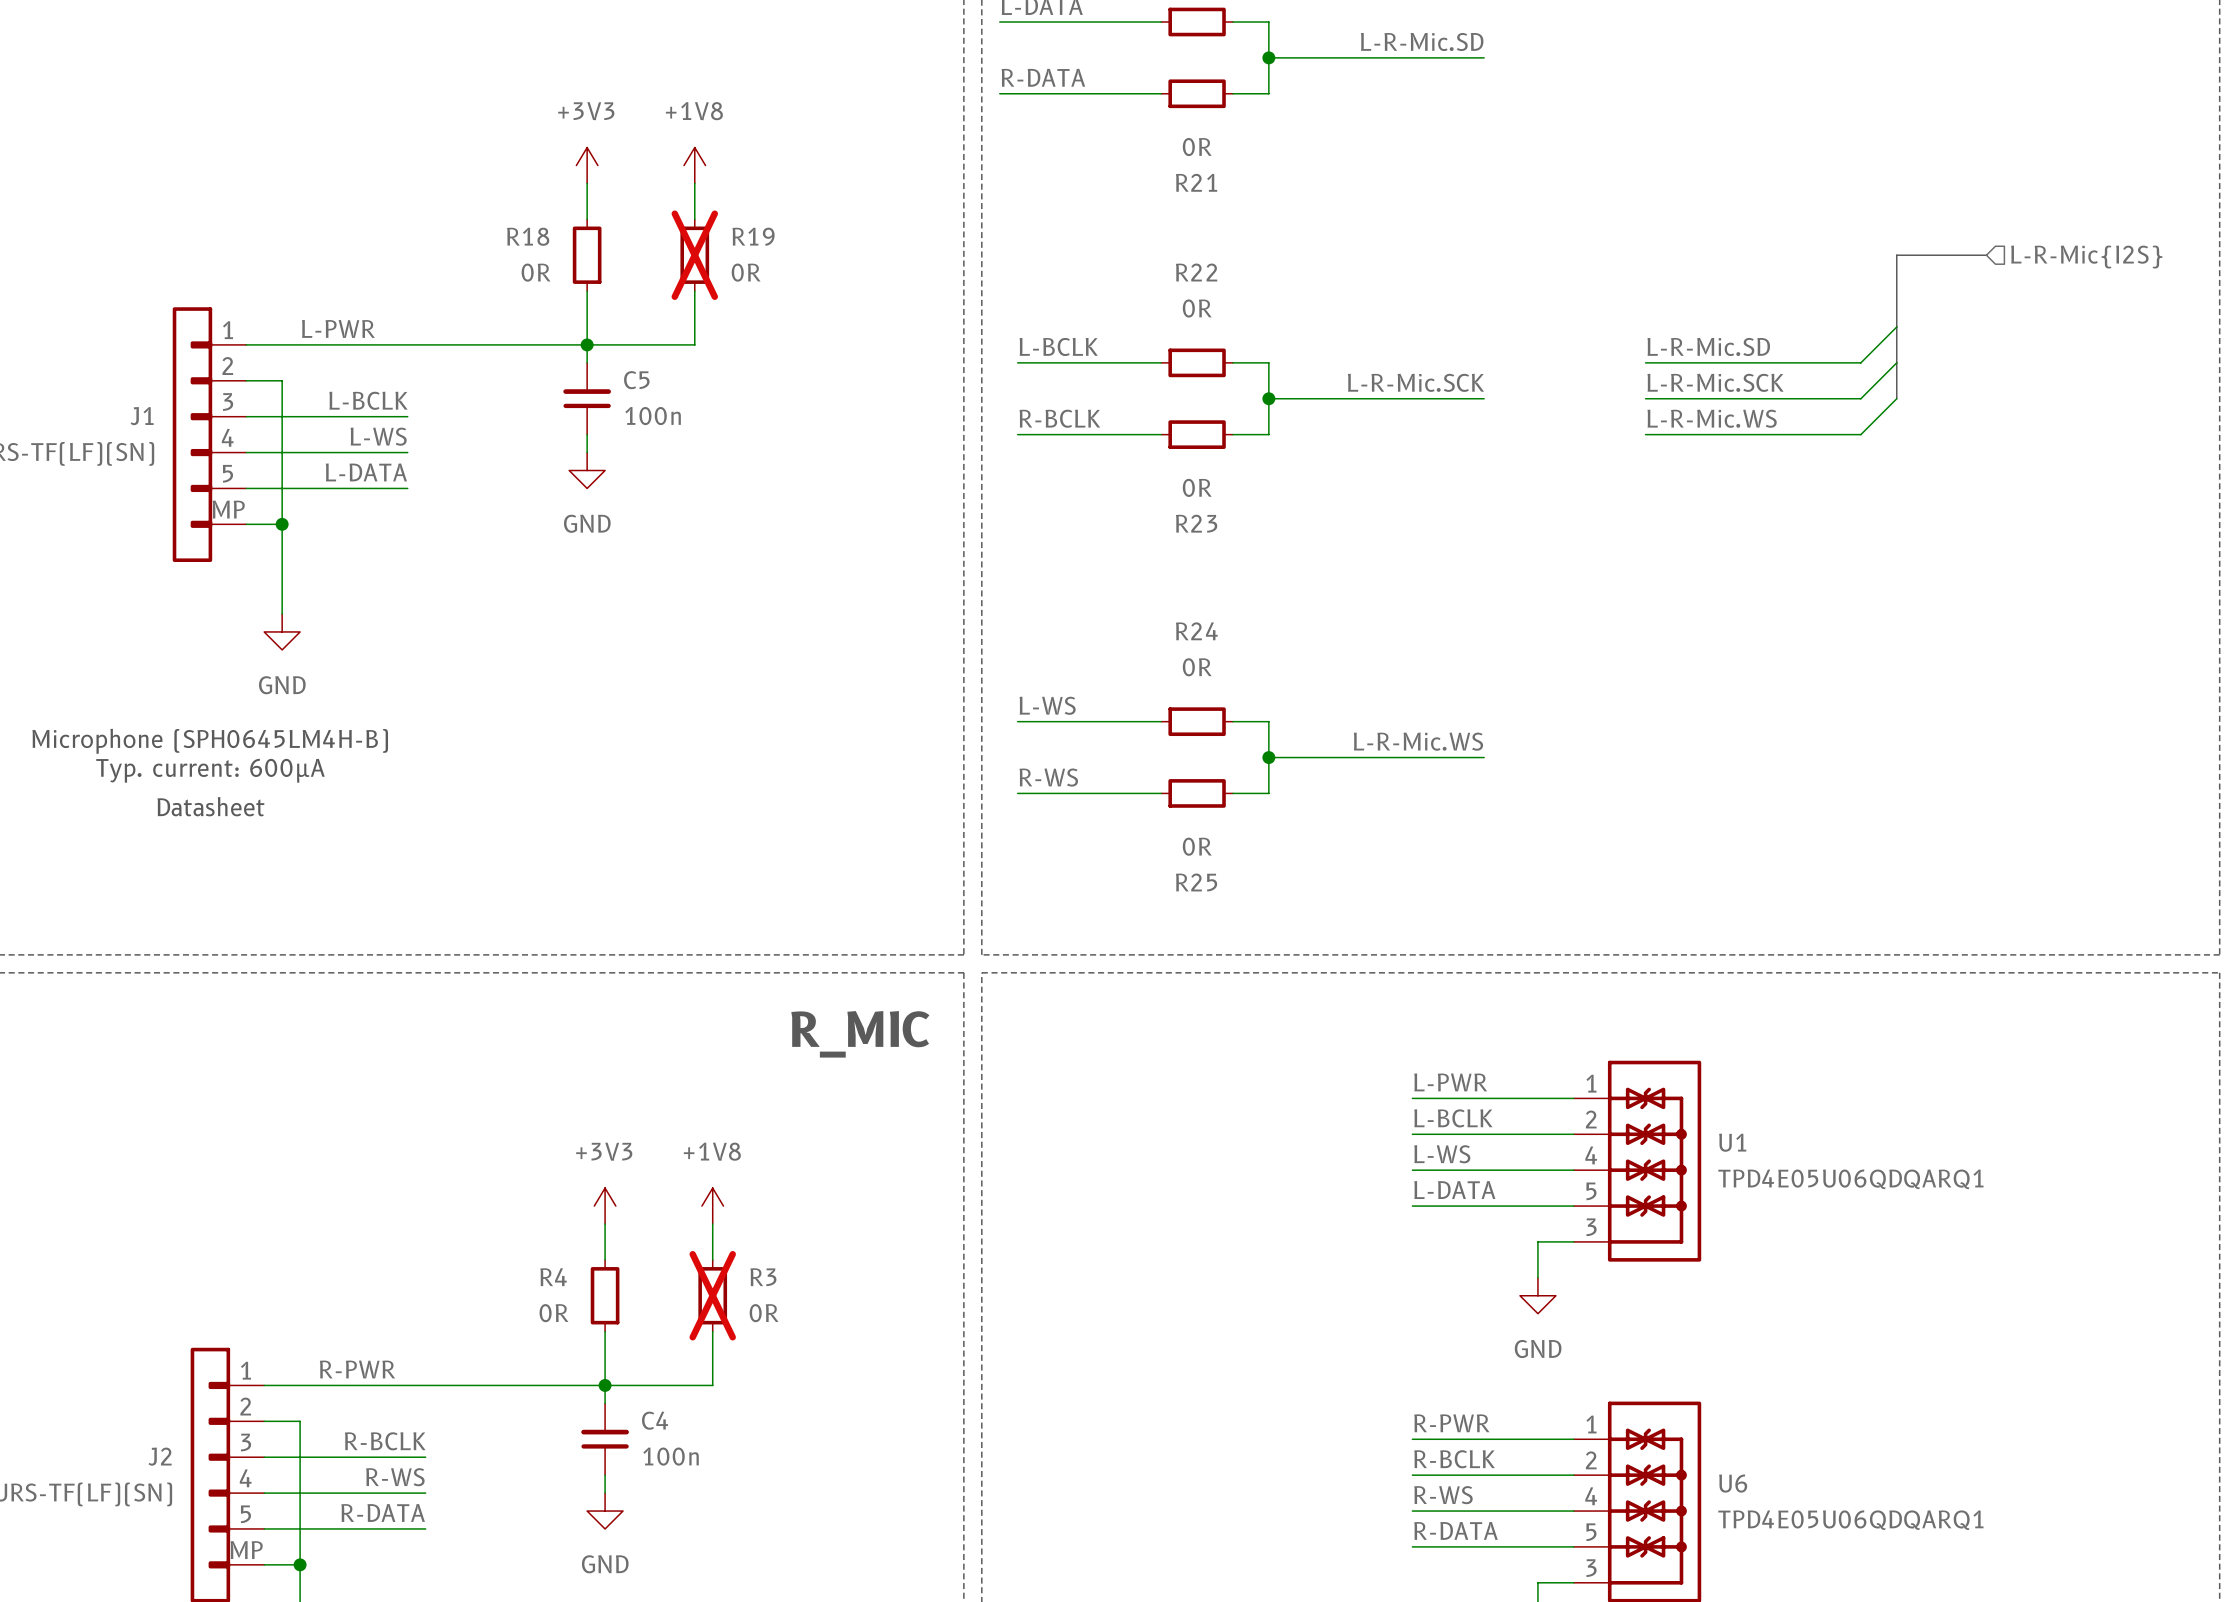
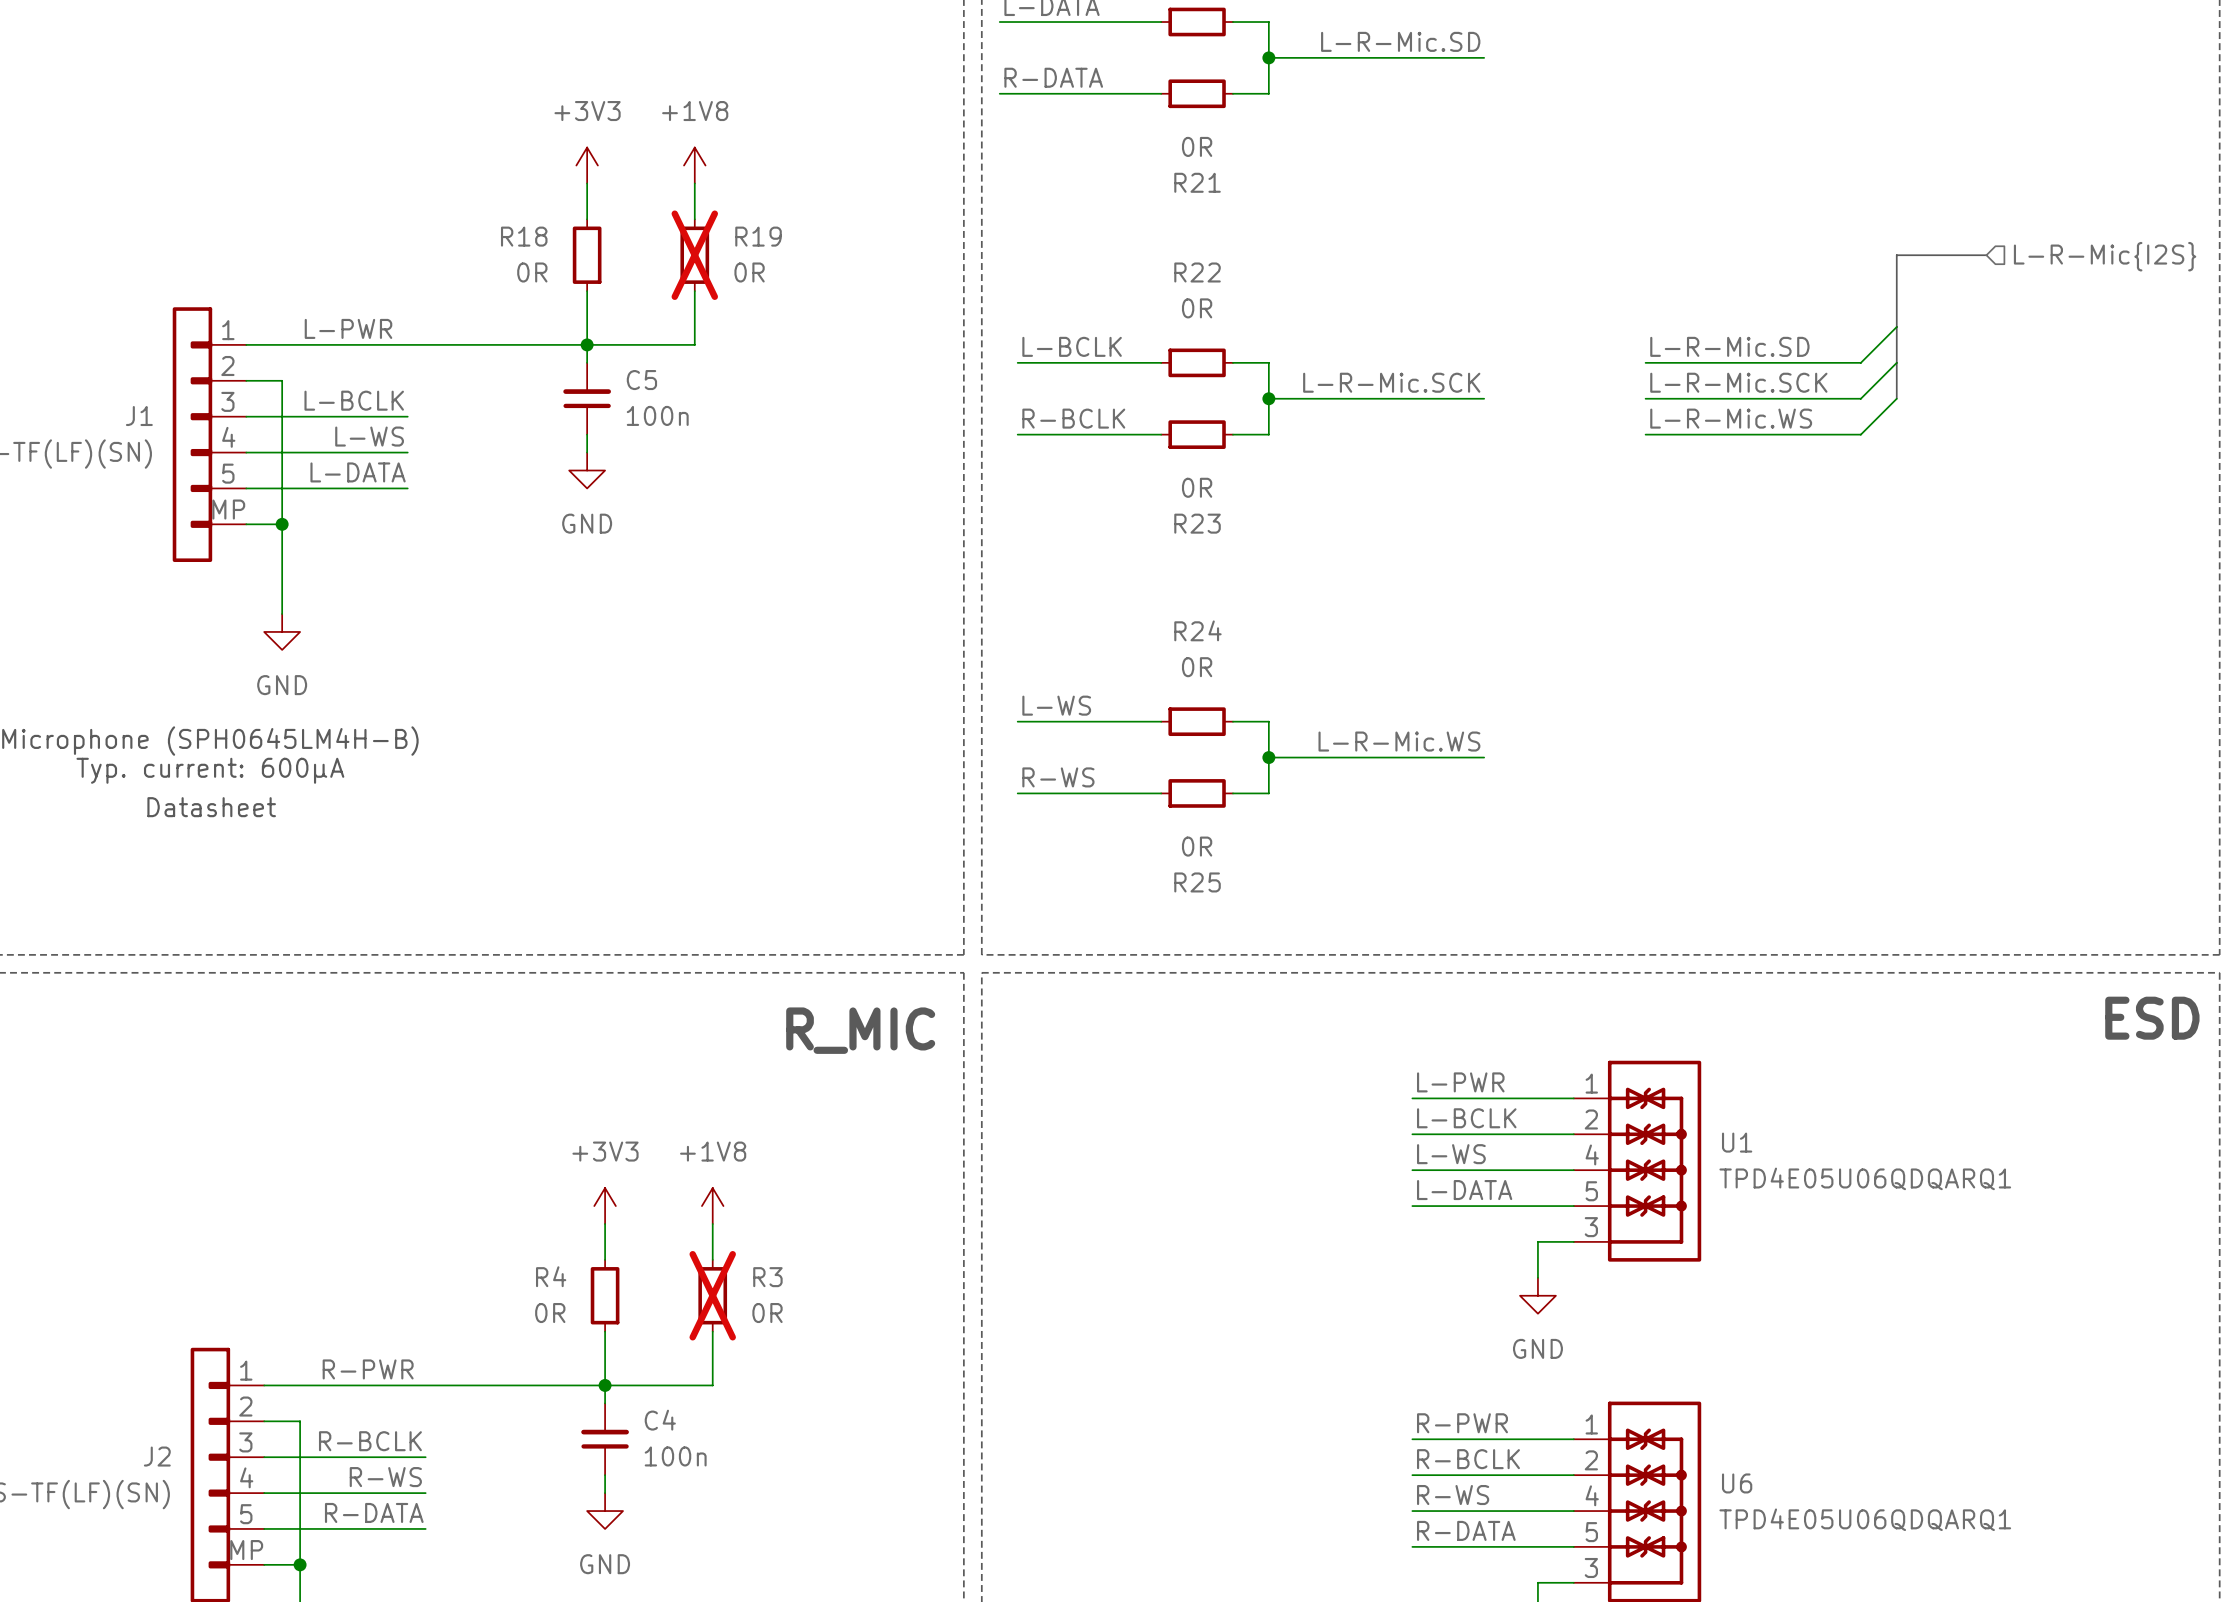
text: none -> ESD (2152, 1018)

